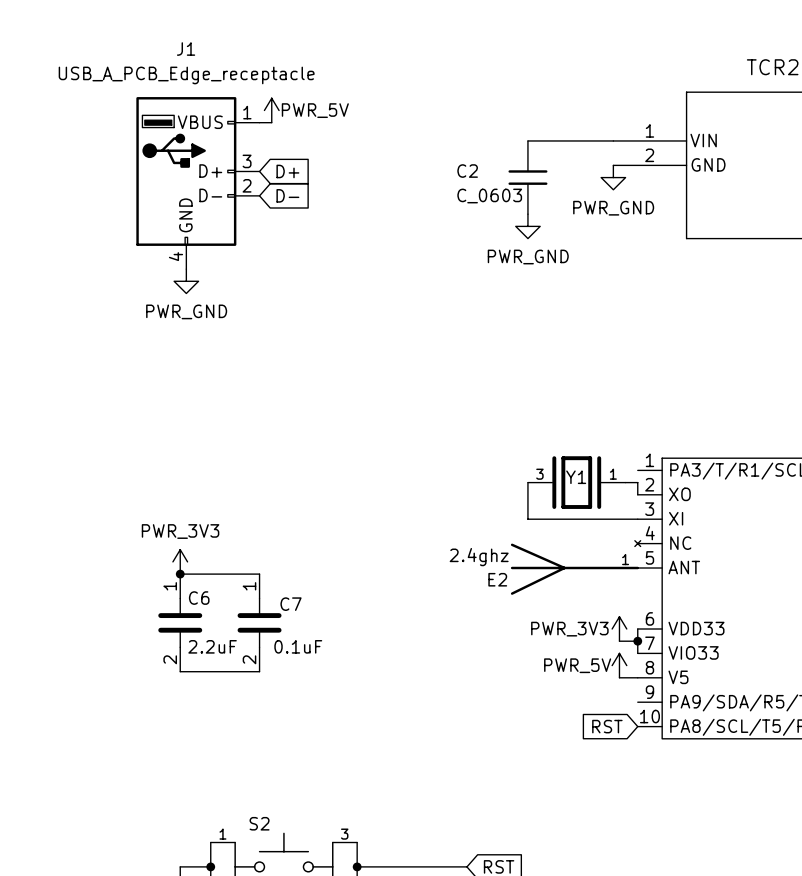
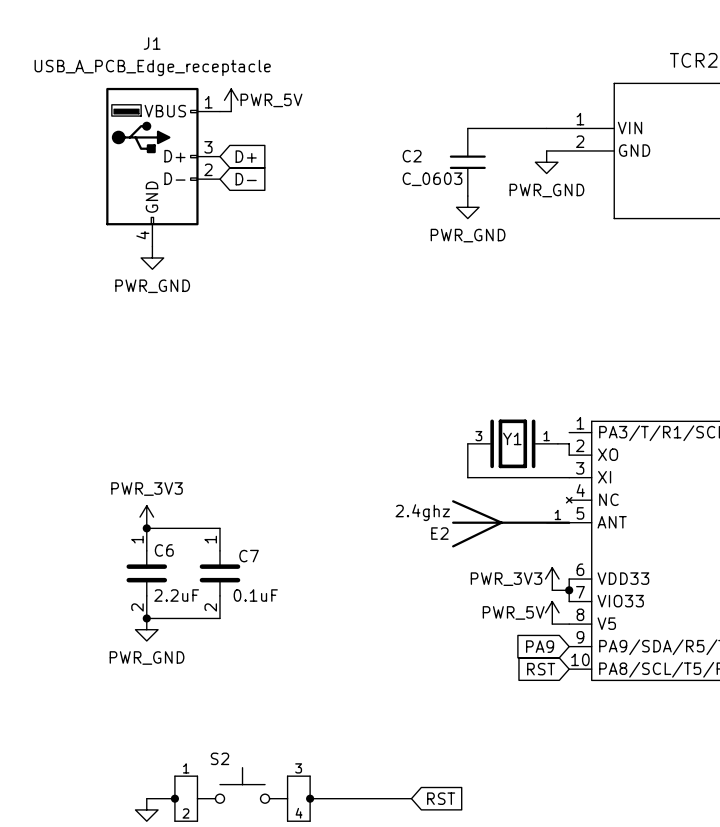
junction: none -> (146, 618)
power symbol: none -> PWR_GND (146, 629)
global label: none -> PA9 (540, 646)

